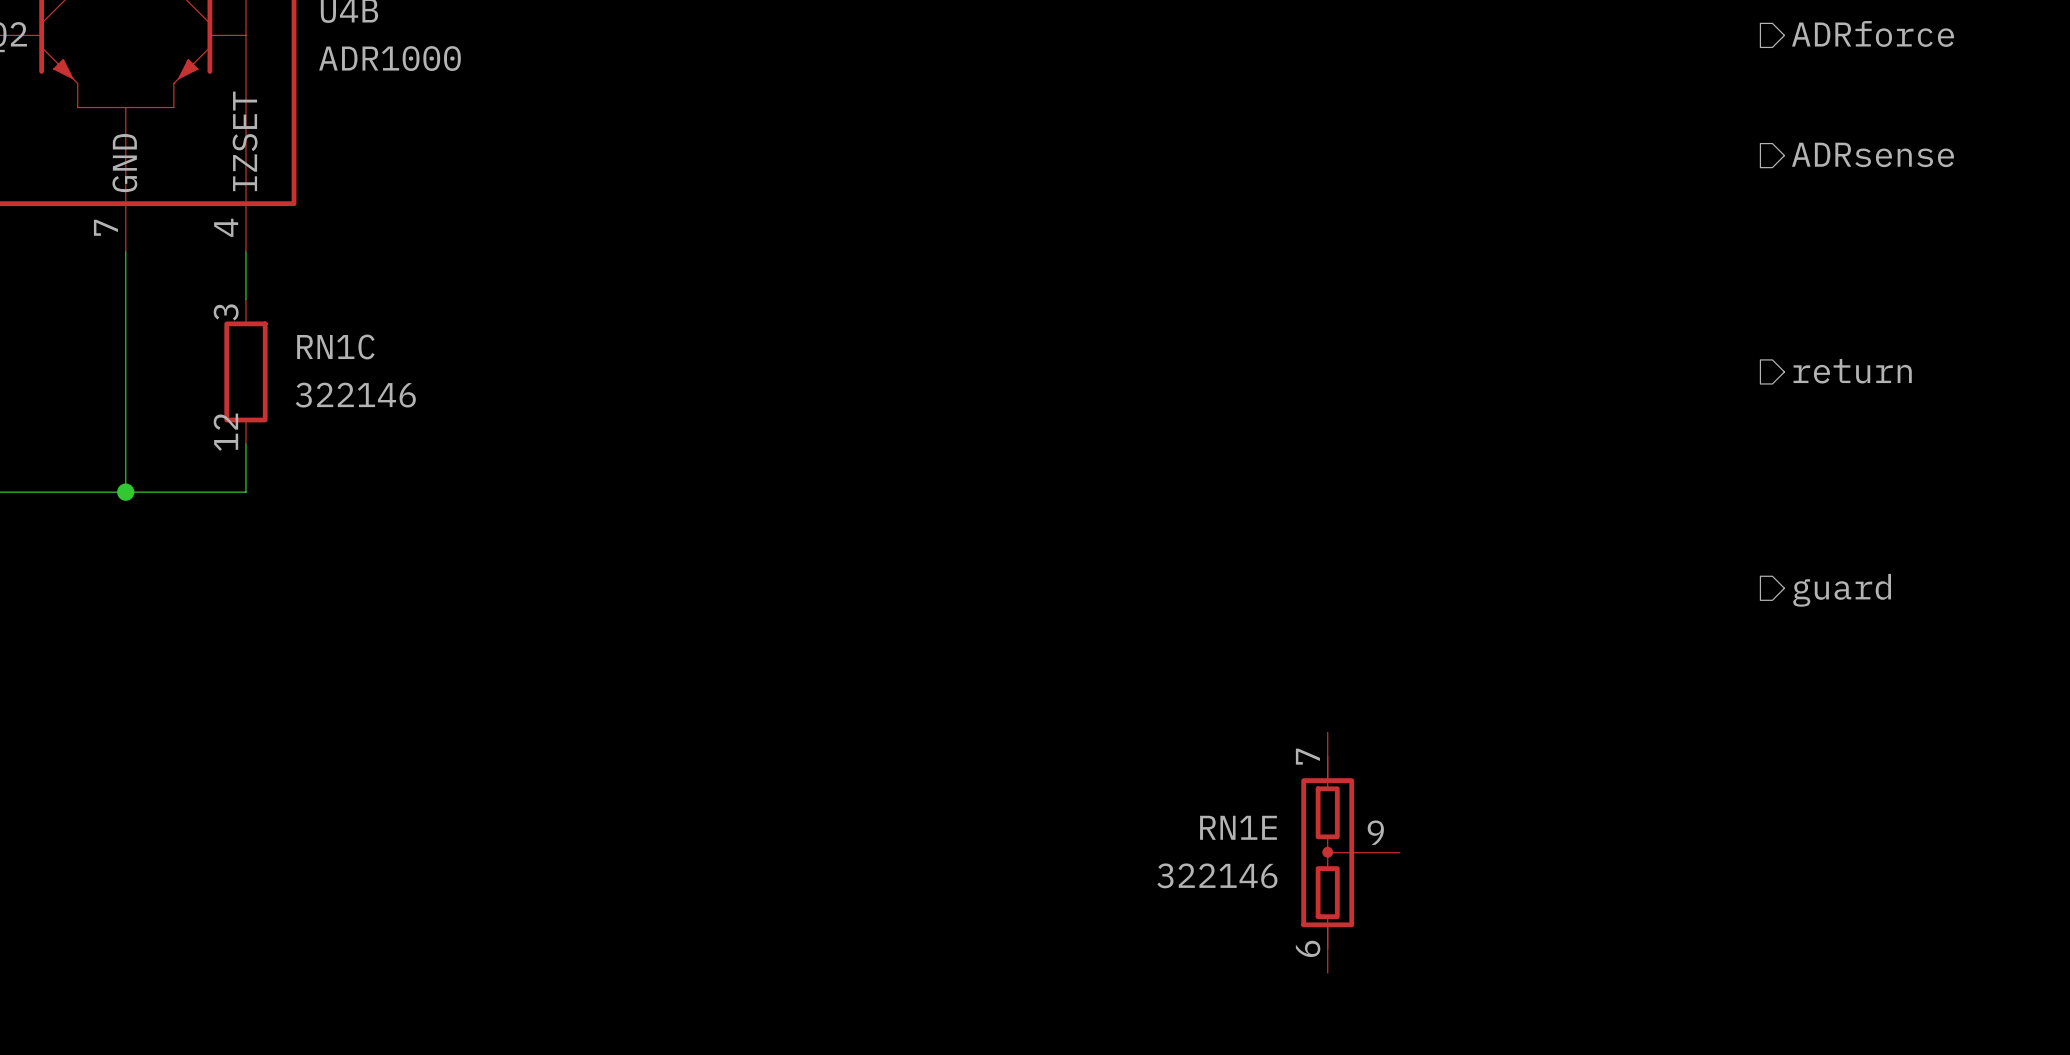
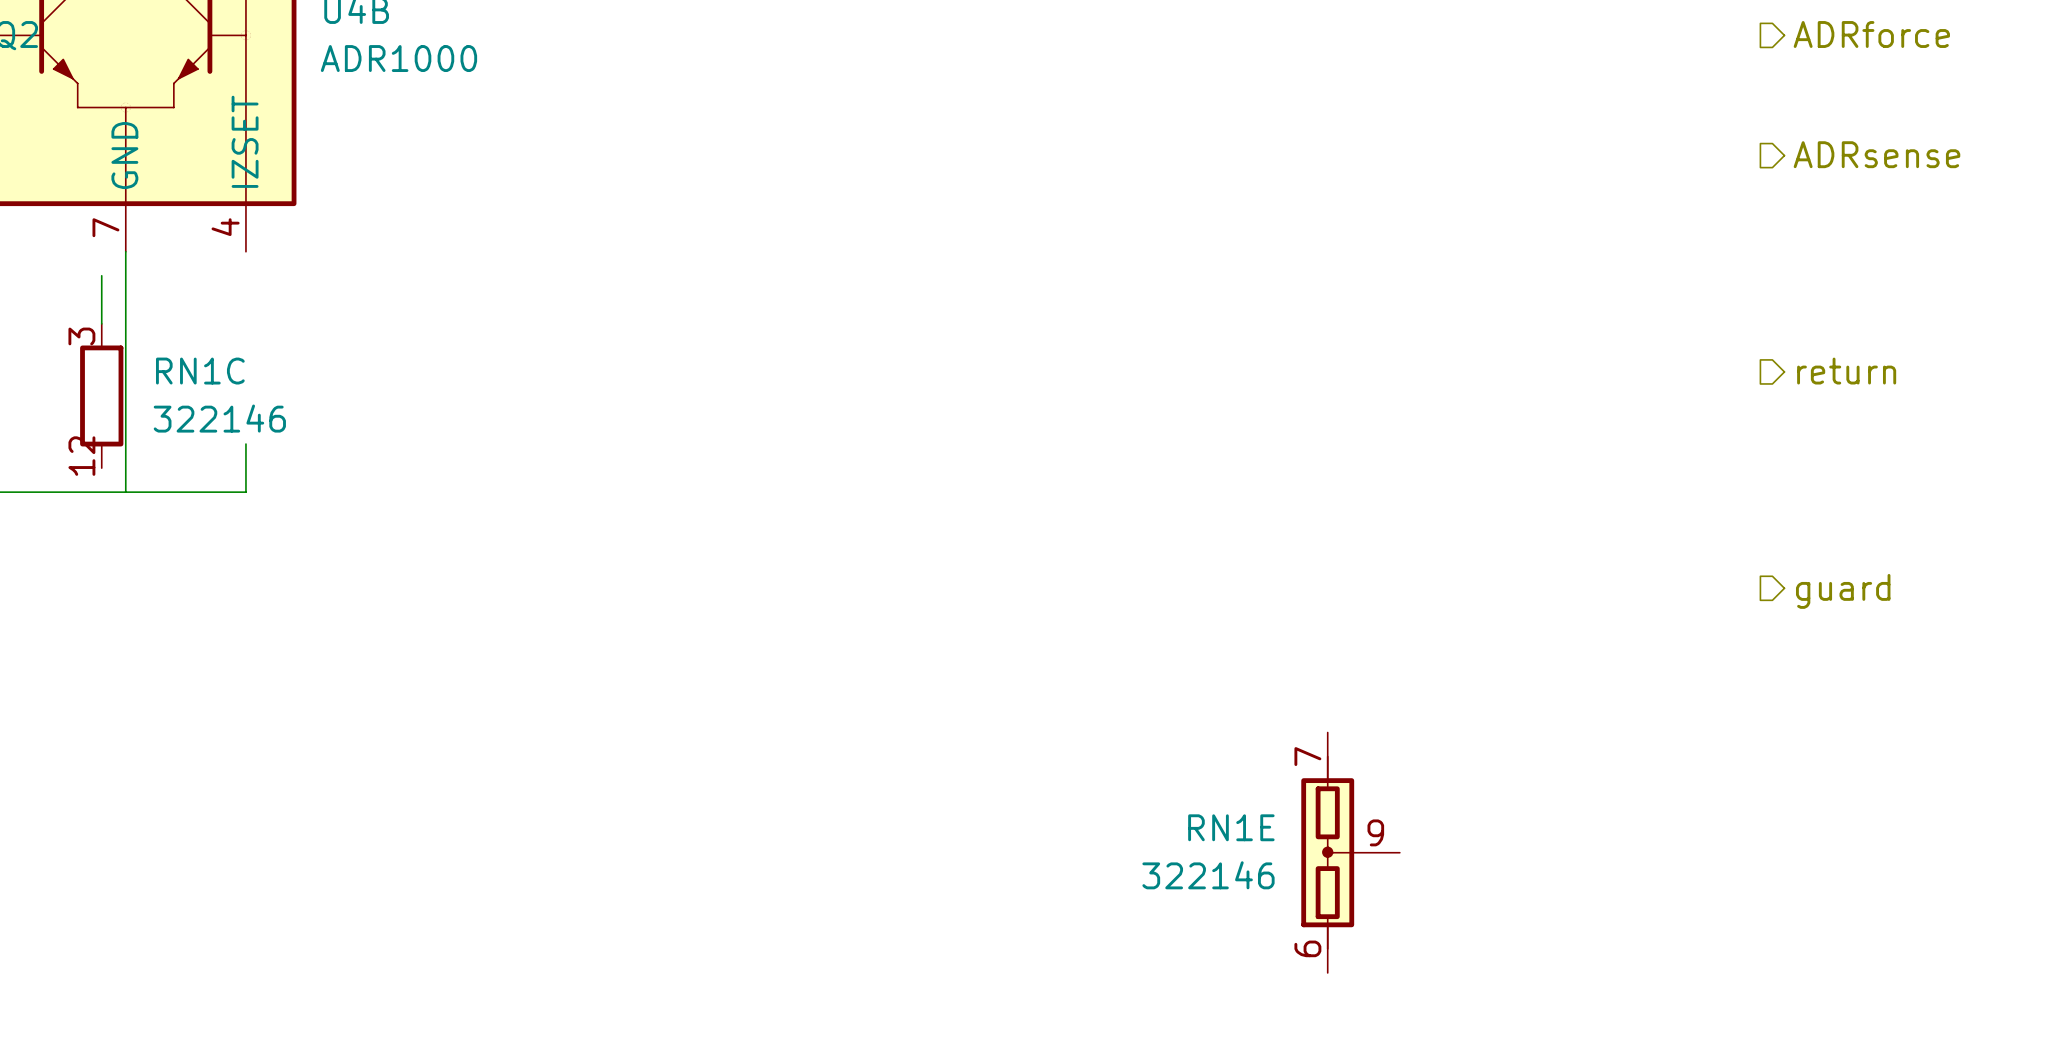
wire: (245, 251) (245, 299) -> (101, 275) (101, 323)
RN1C position: (245, 371) -> (101, 395)
junction: (125, 492) -> none

